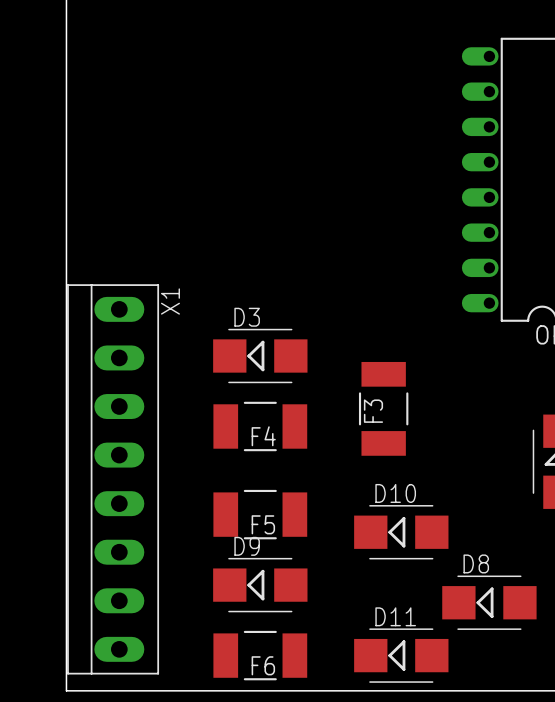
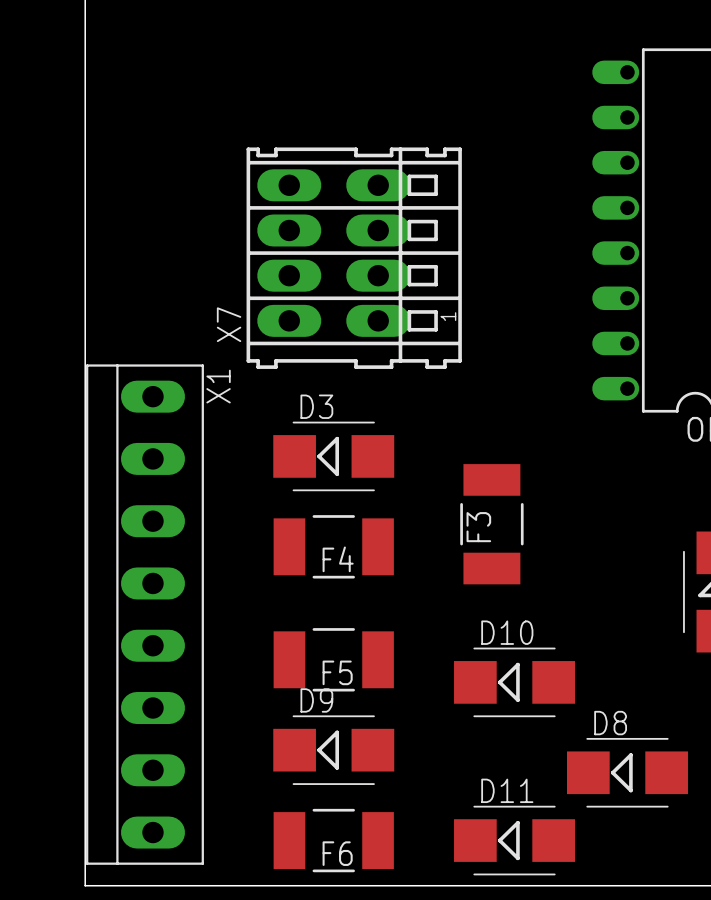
X7: none -> (354, 258)

